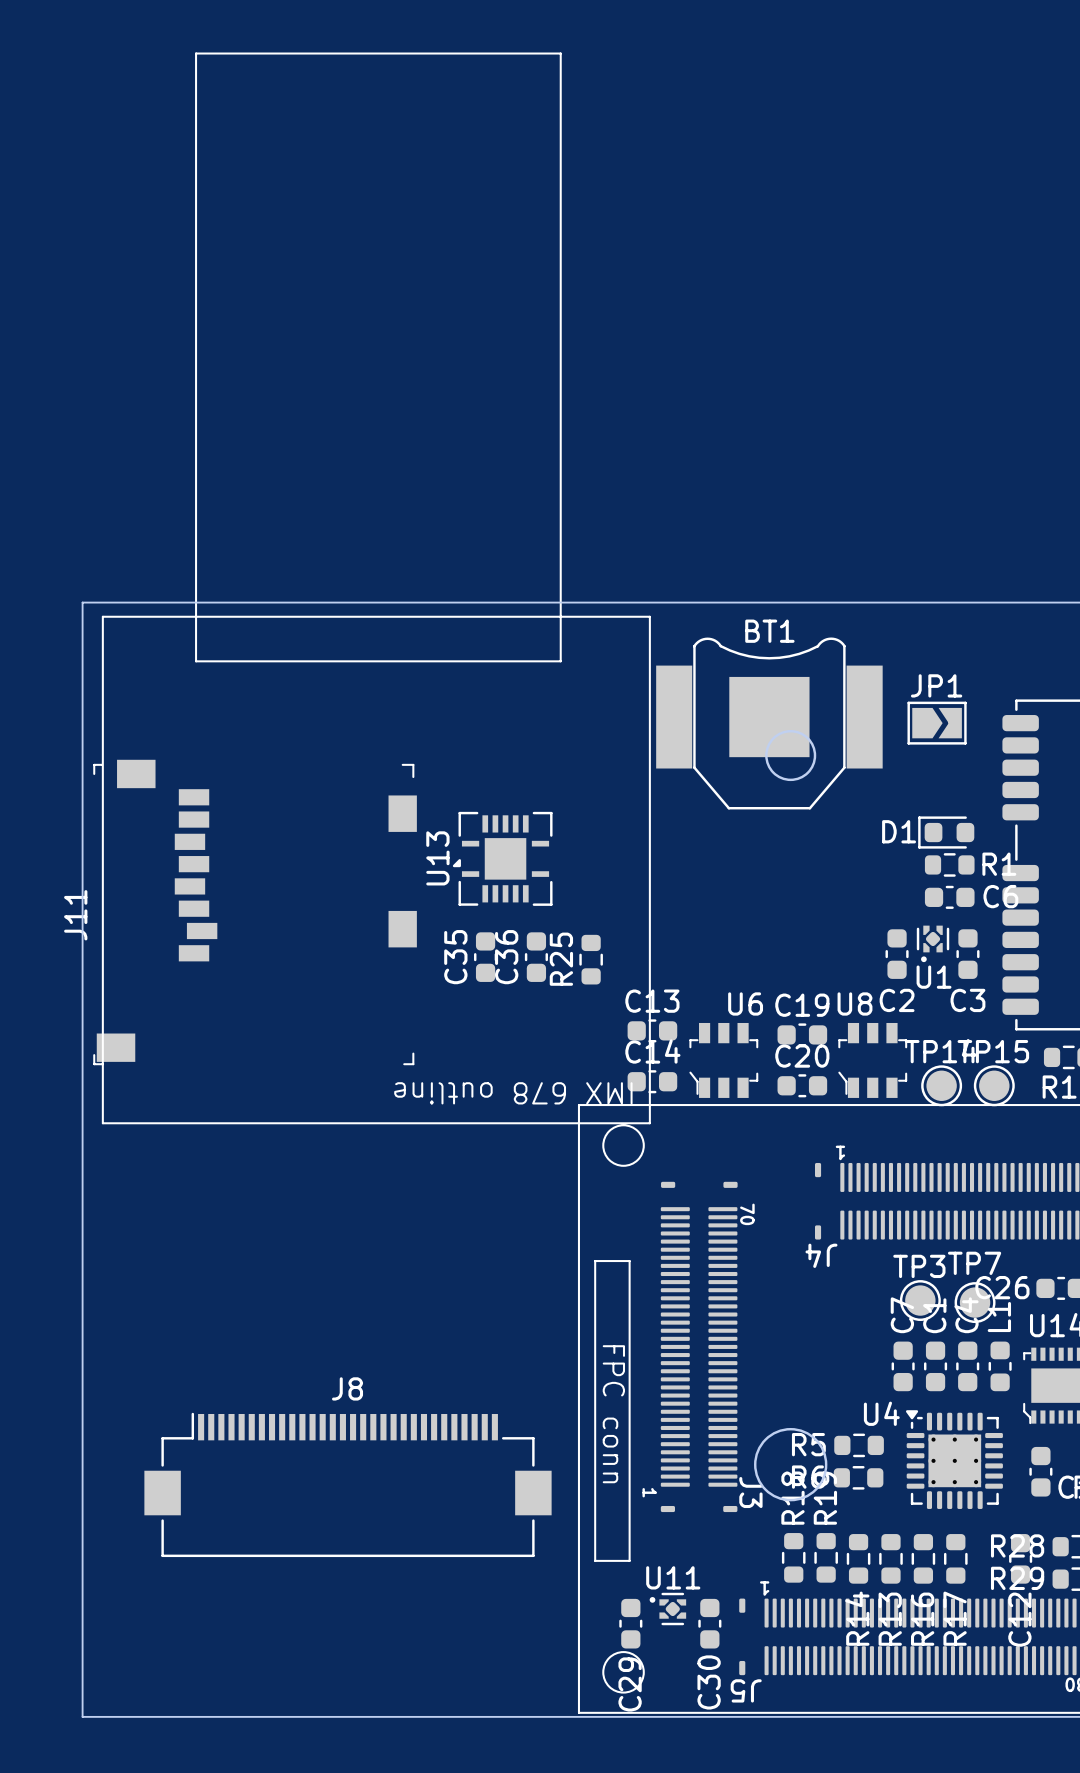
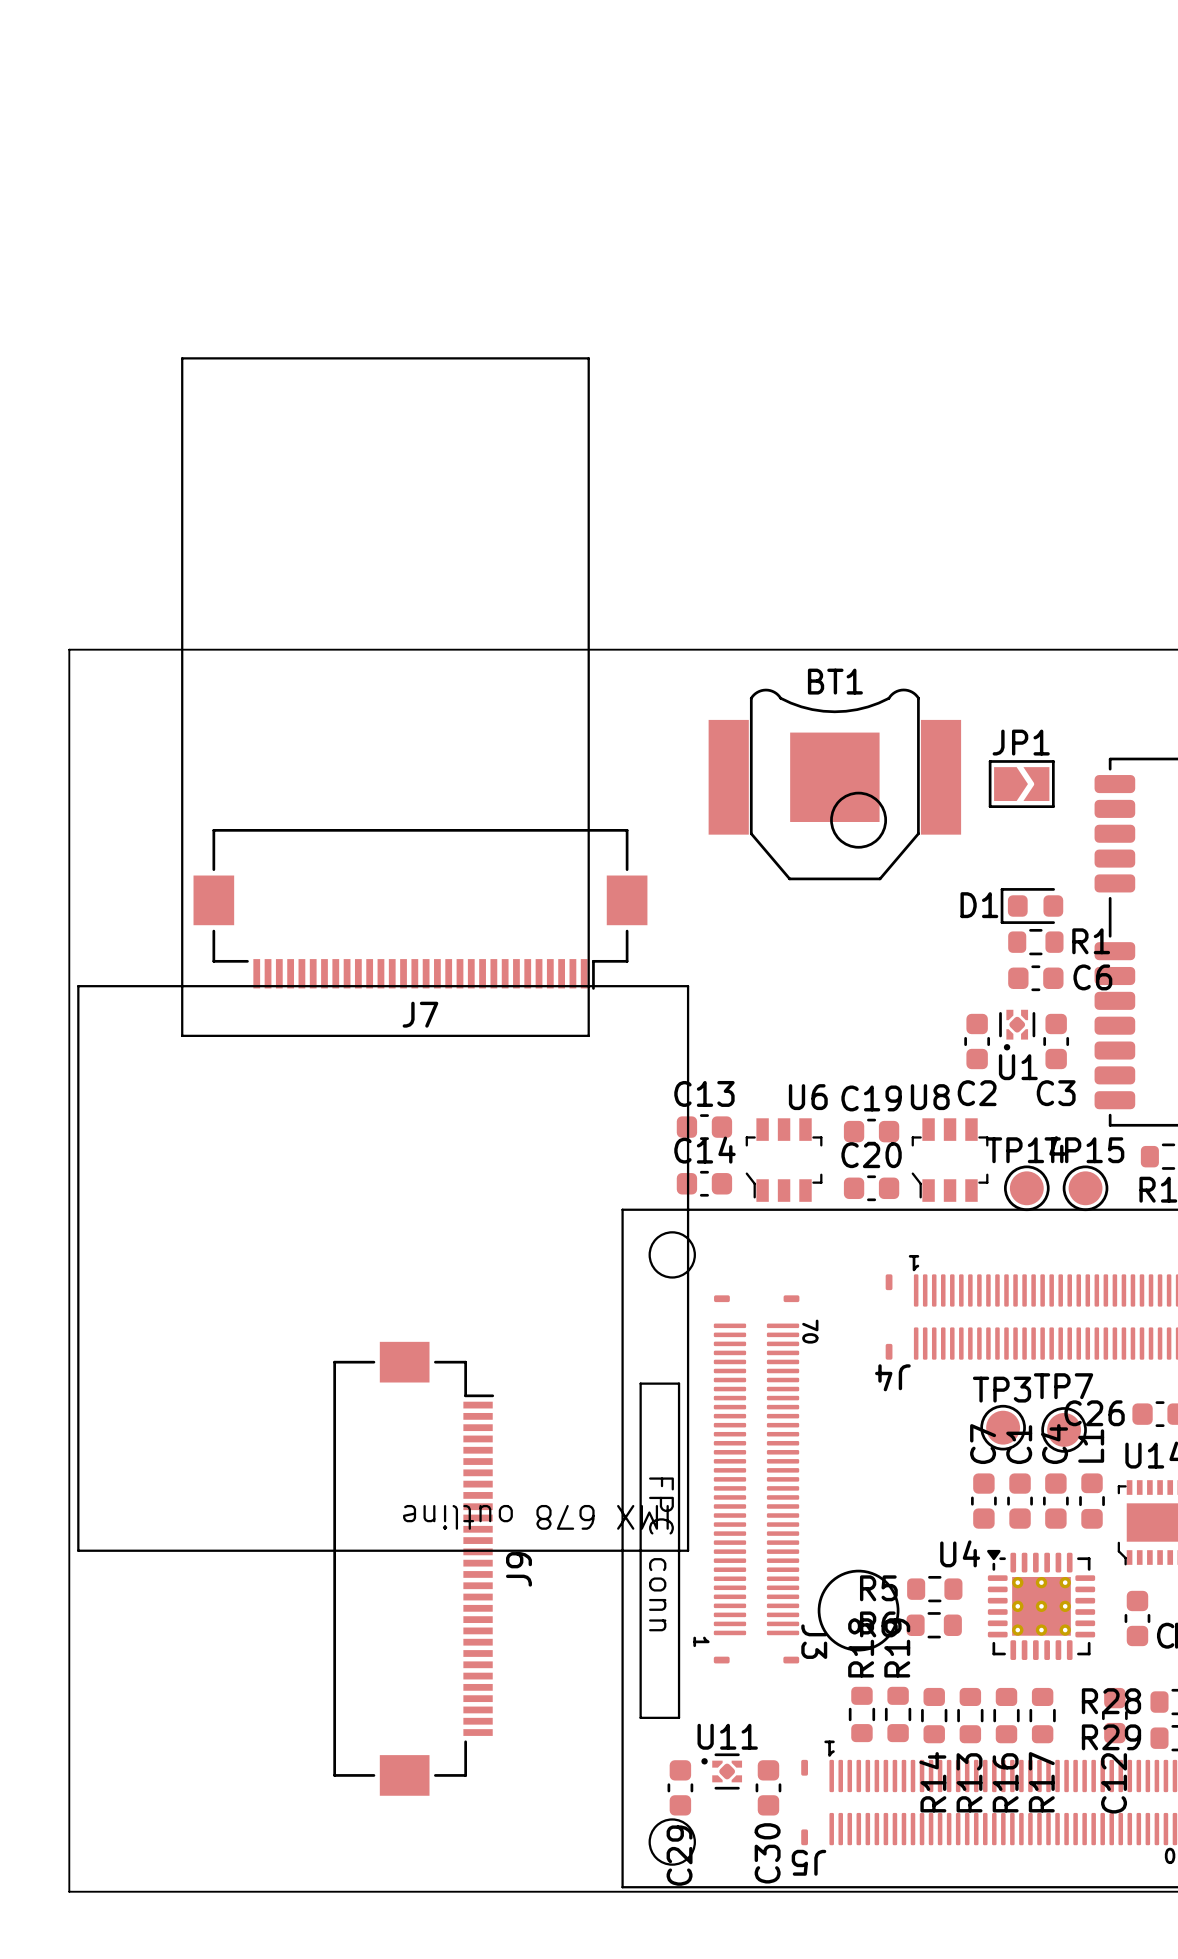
line: (196, 53) (560, 53) (560, 661) (196, 661) (196, 53) -> (182, 358) (588, 358) (588, 1035) (182, 1035) (182, 358)
line: (102, 616) (649, 616) (649, 1123) (102, 1123) (102, 616) -> (78, 986) (688, 986) (688, 1550) (78, 1550) (78, 986)
J7: none -> (420, 909)
U13: (502, 858) -> none
J11: (255, 912) -> none
C35: (485, 957) -> none
C36: (536, 957) -> none
R25: (591, 959) -> none
text position: IMX 678 outline (513, 1093) -> IMX 678 outline (535, 1517)
J9: none -> (413, 1568)
J8: (348, 1484) -> none

